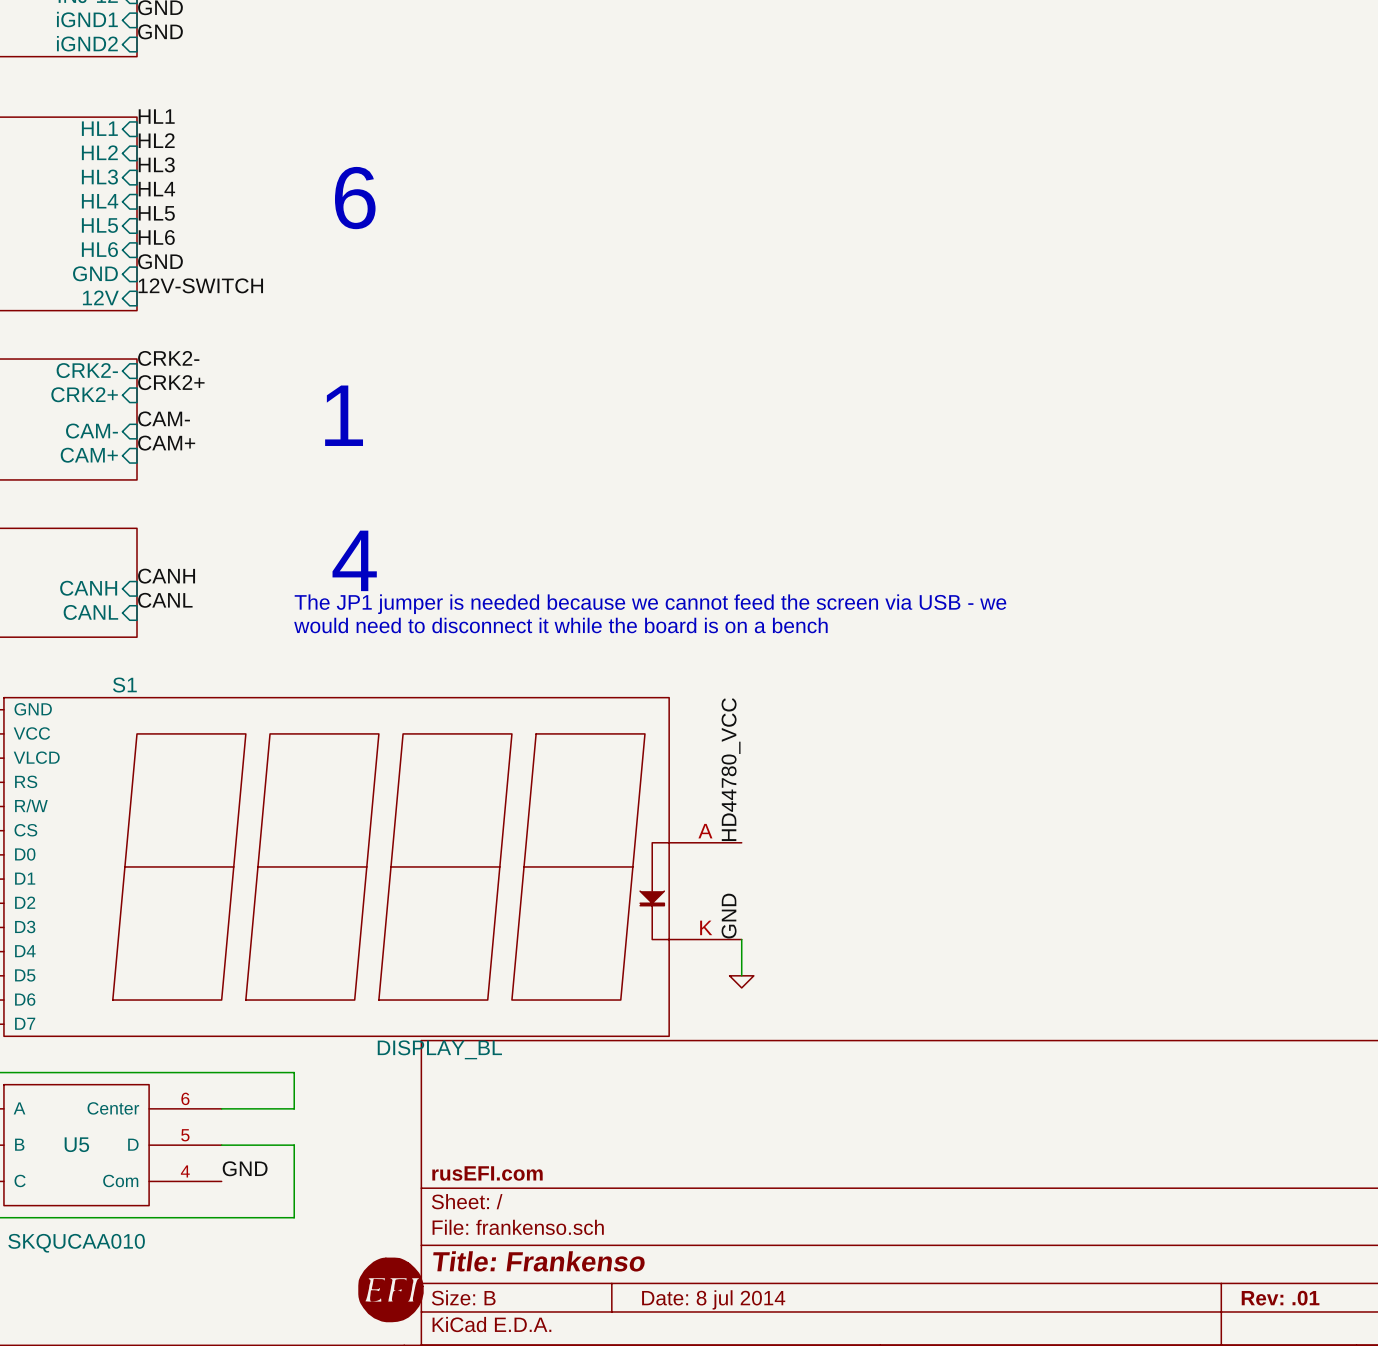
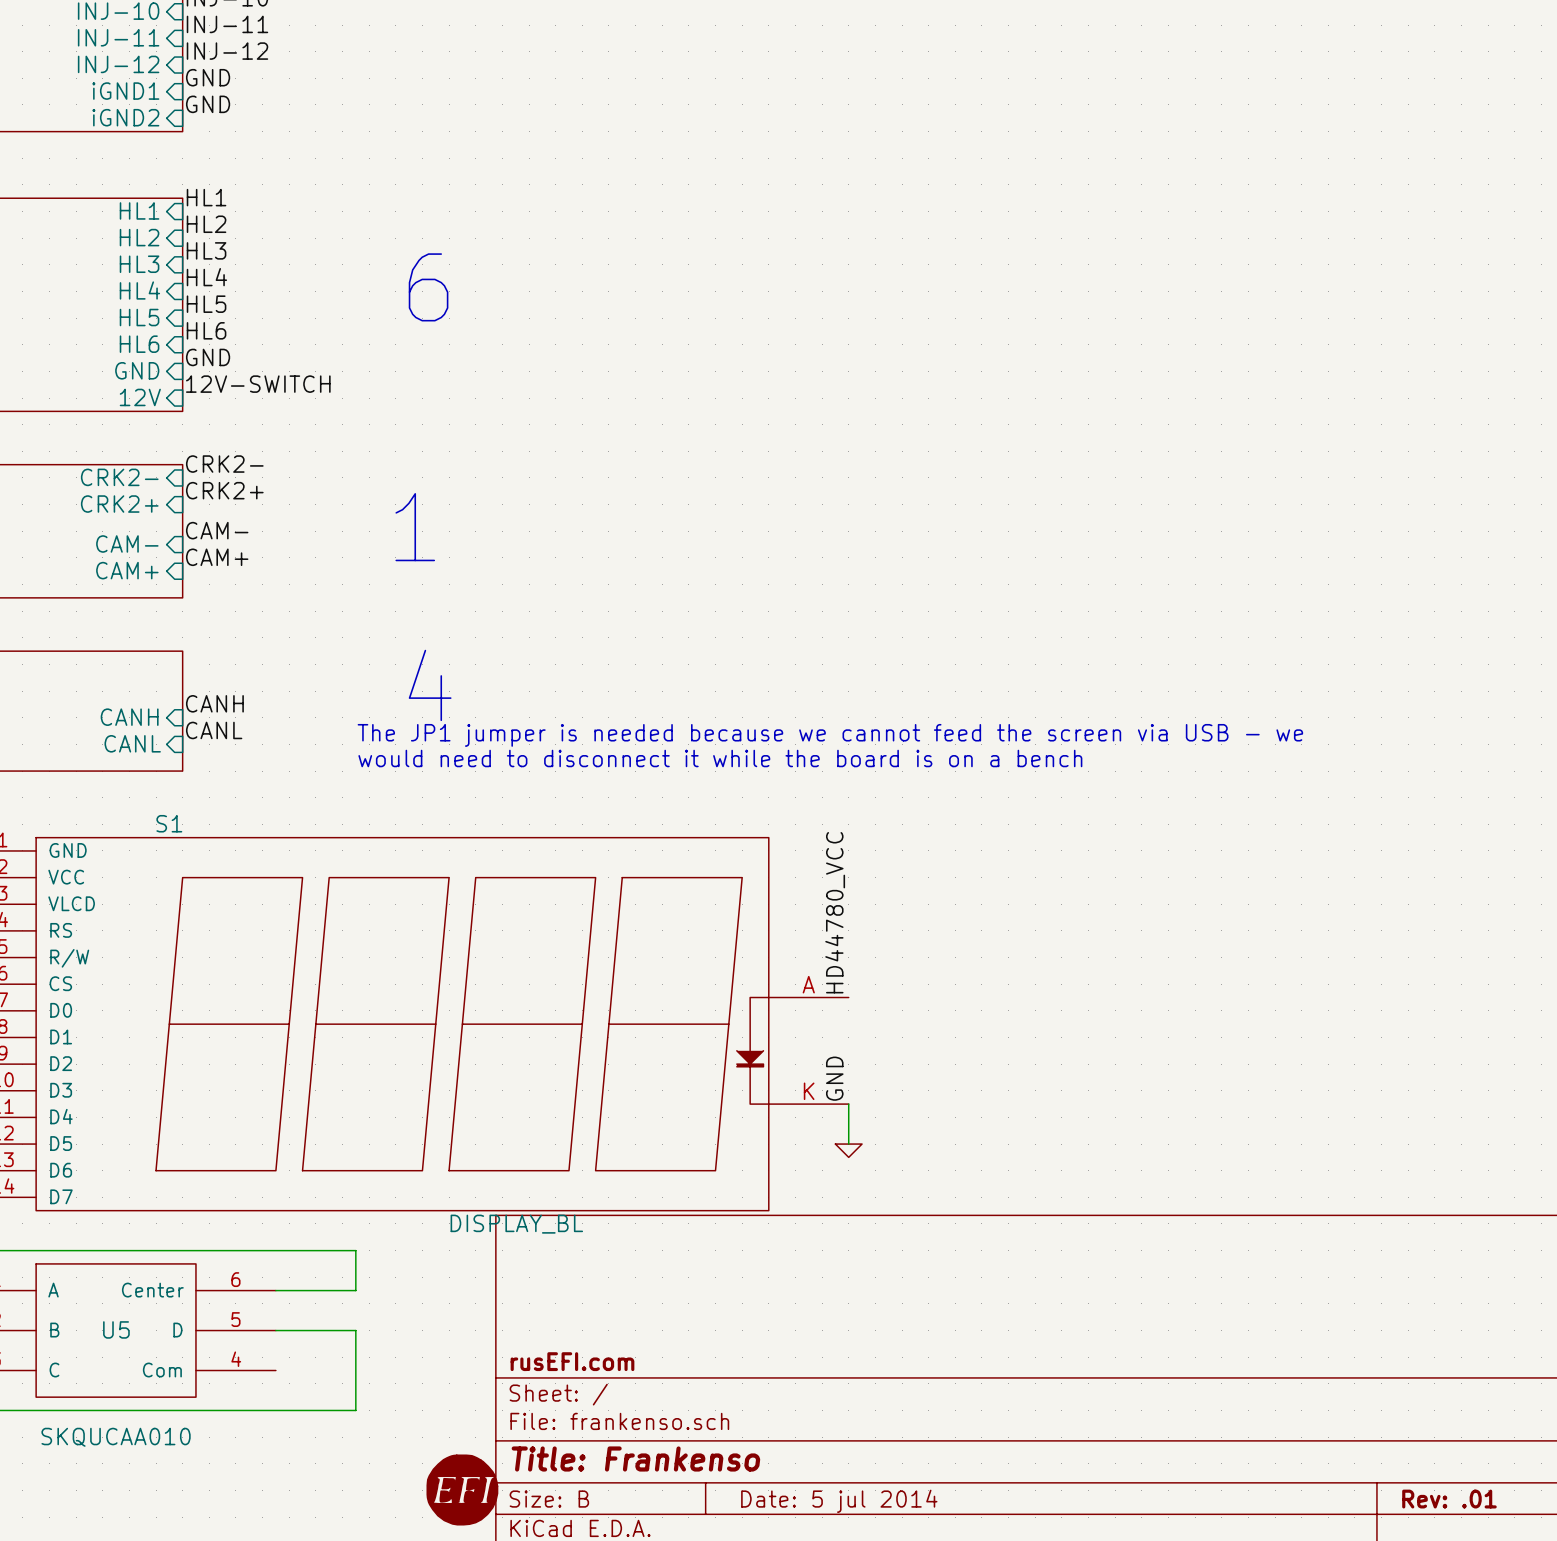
label: GND (245, 1168) -> none
title block: Date: 8 jul 2014 (713, 1299) -> Date: 5 jul 2014 (839, 1501)

